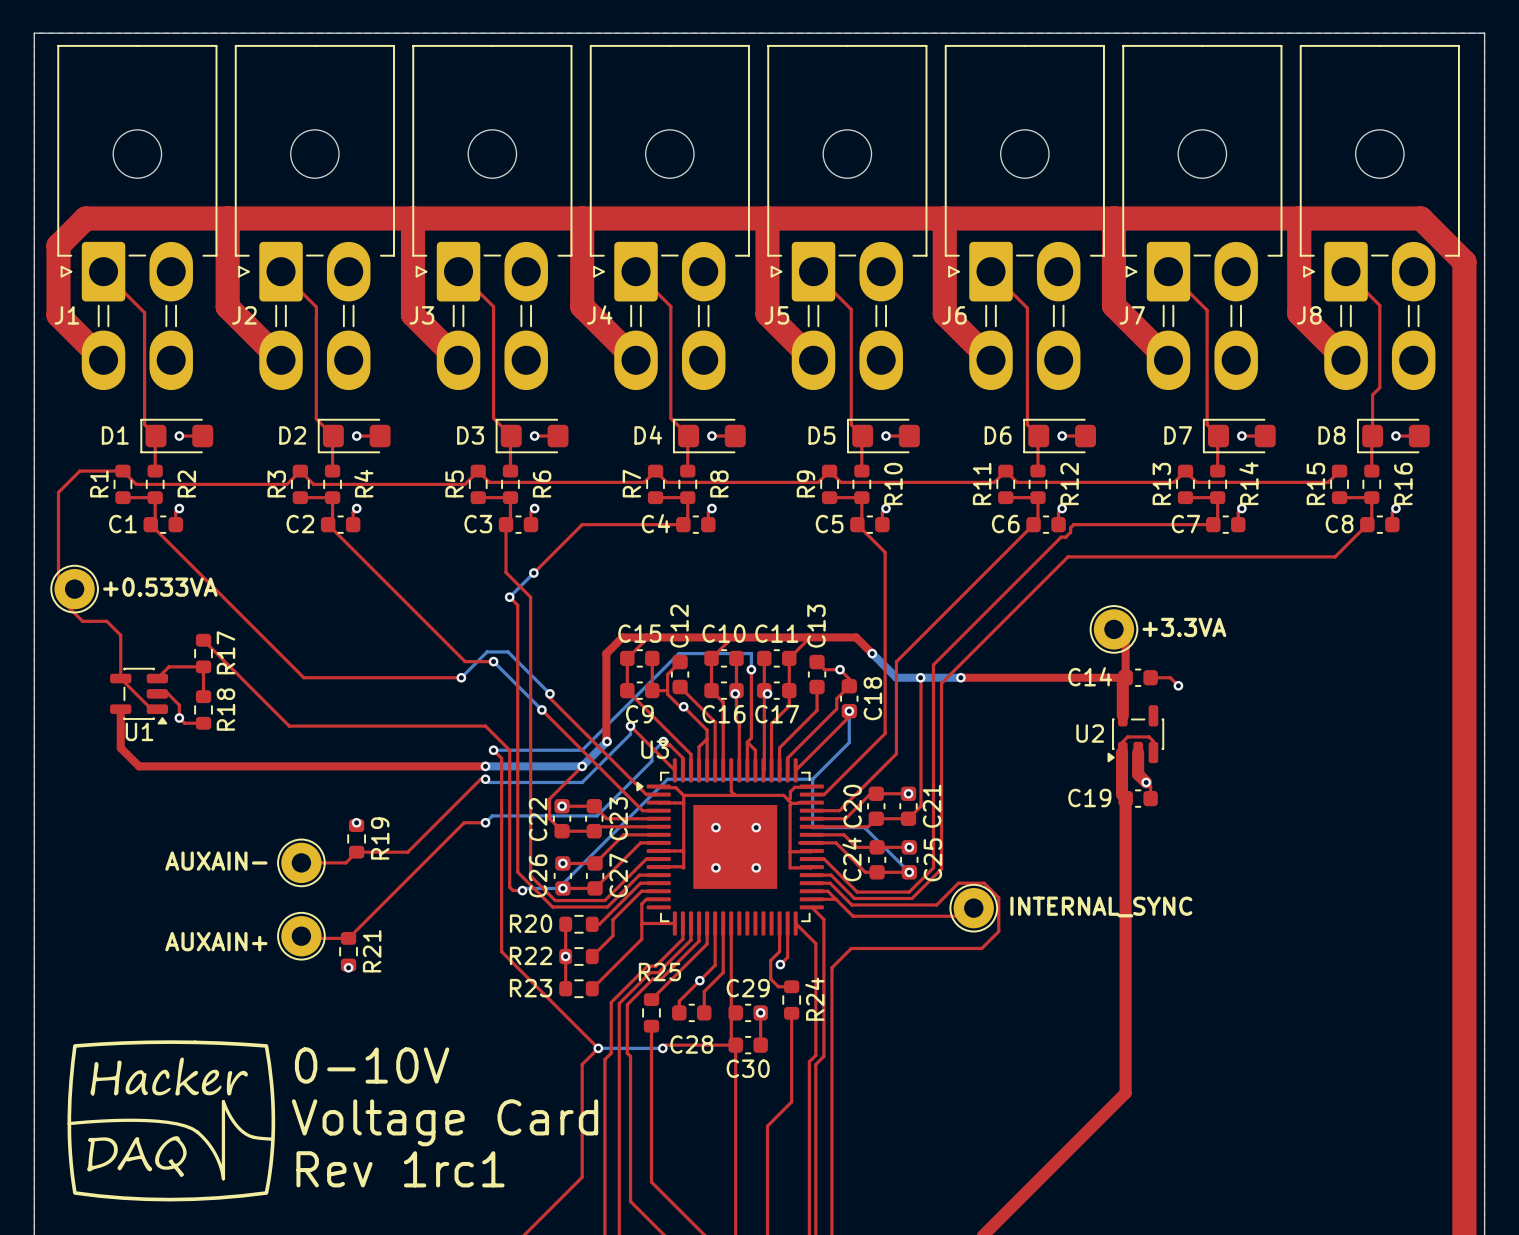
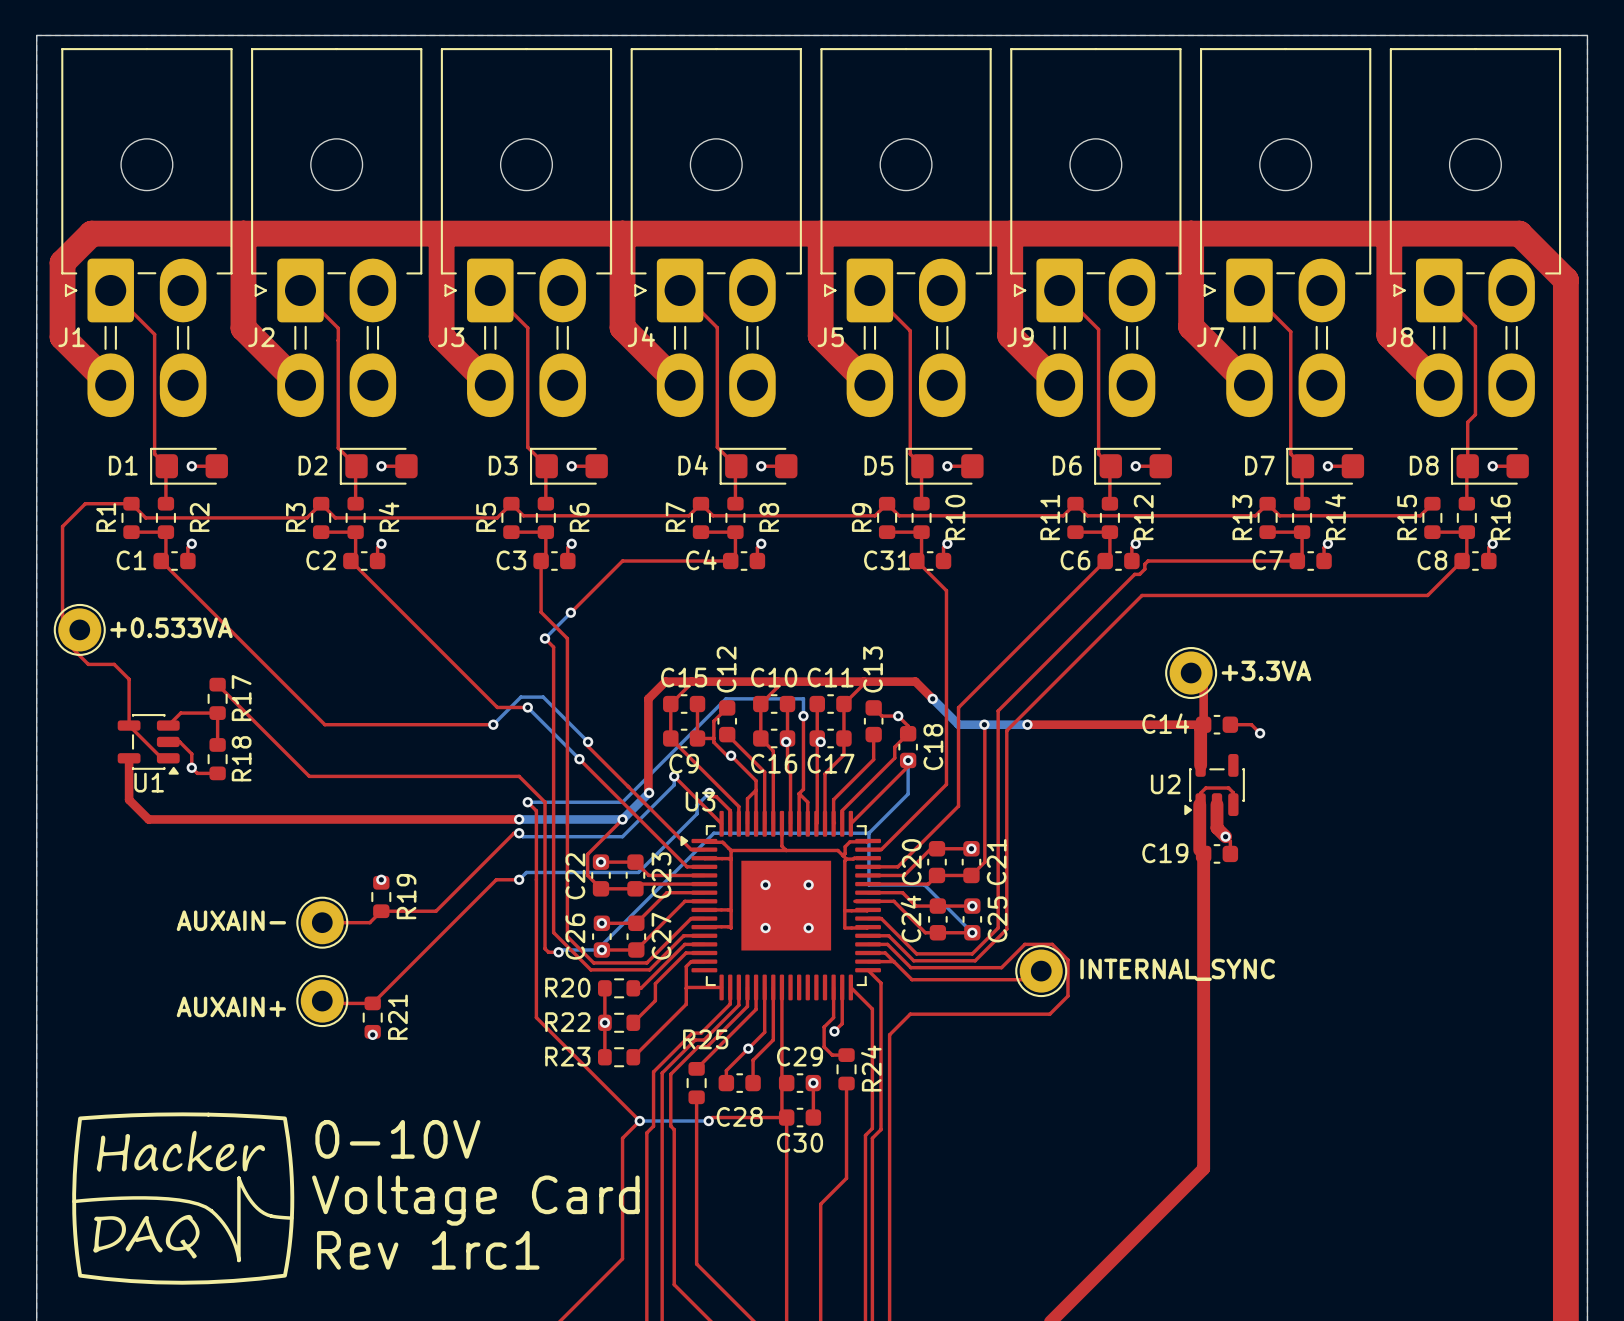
J6 name: J6 (954, 315) -> J9 (1020, 337)
C5 name: C5 (829, 524) -> C31 (887, 560)

